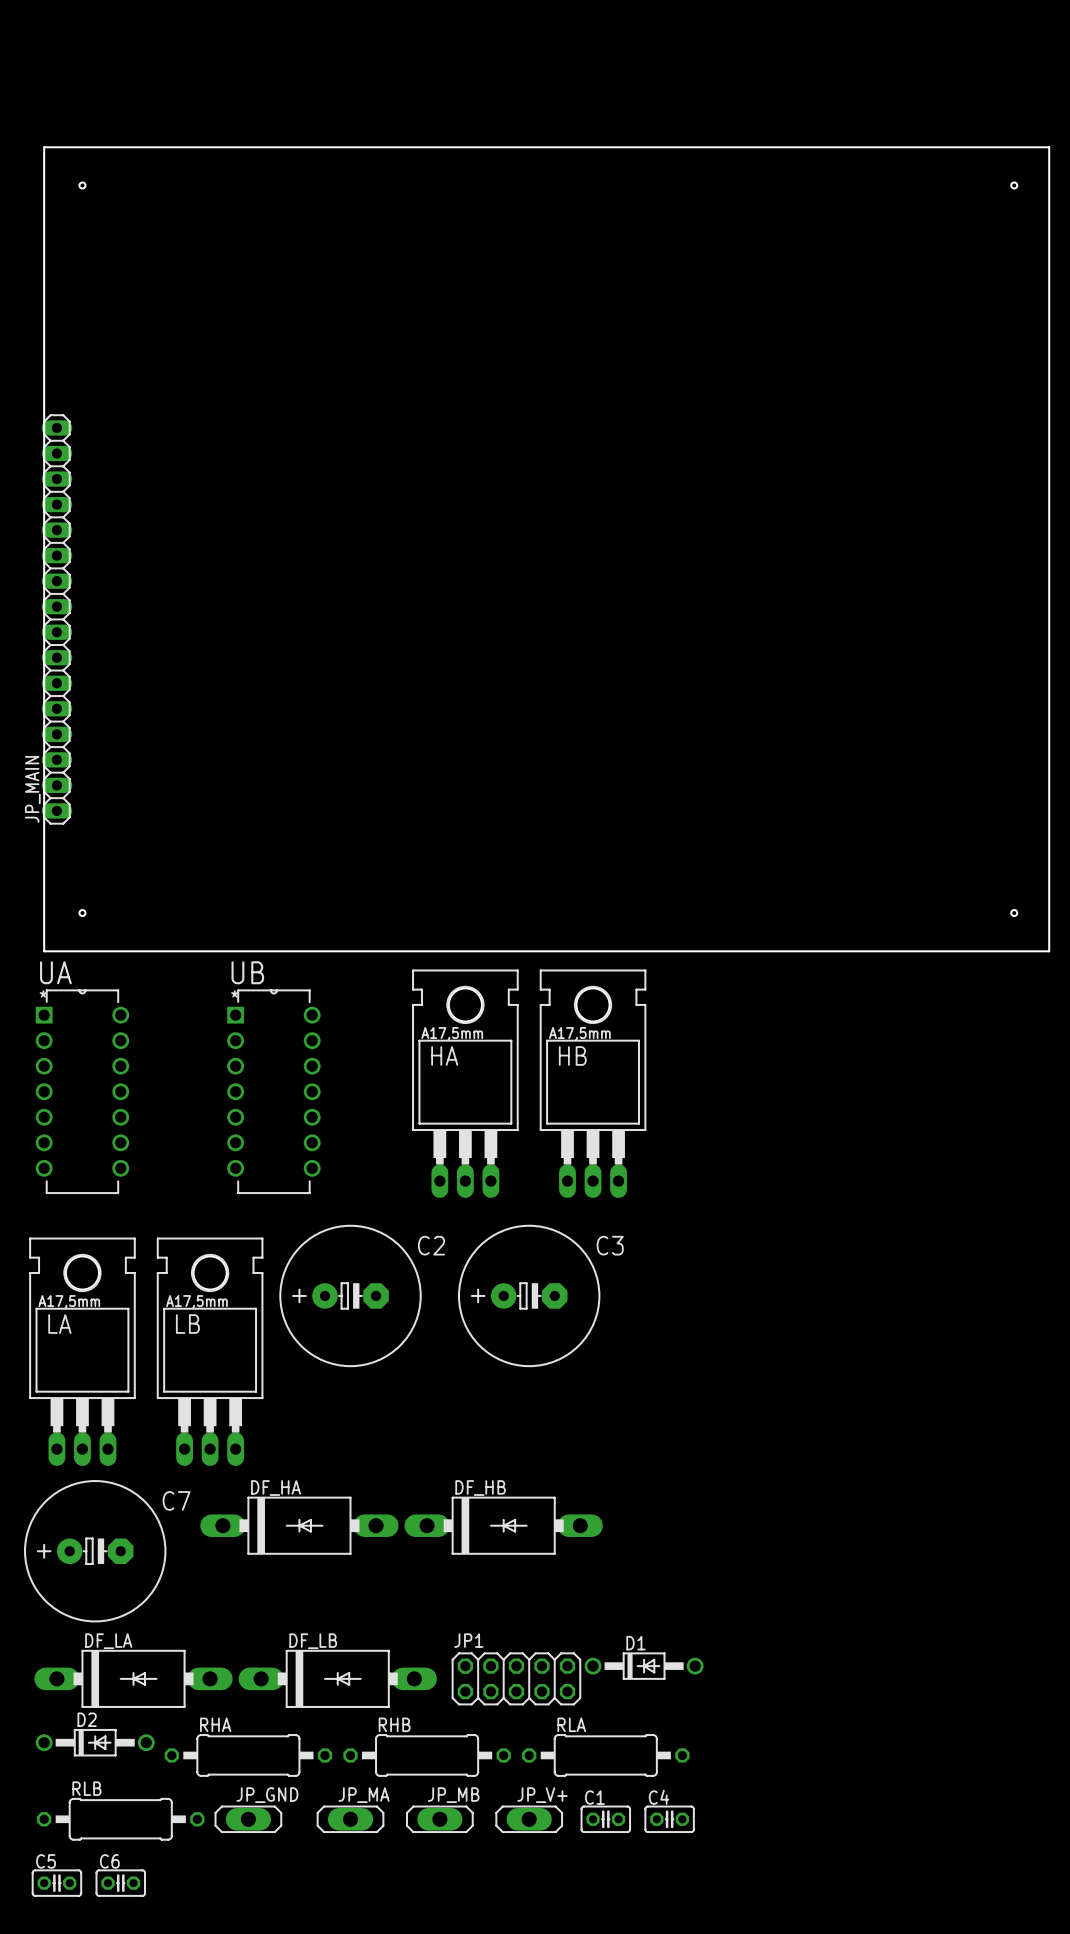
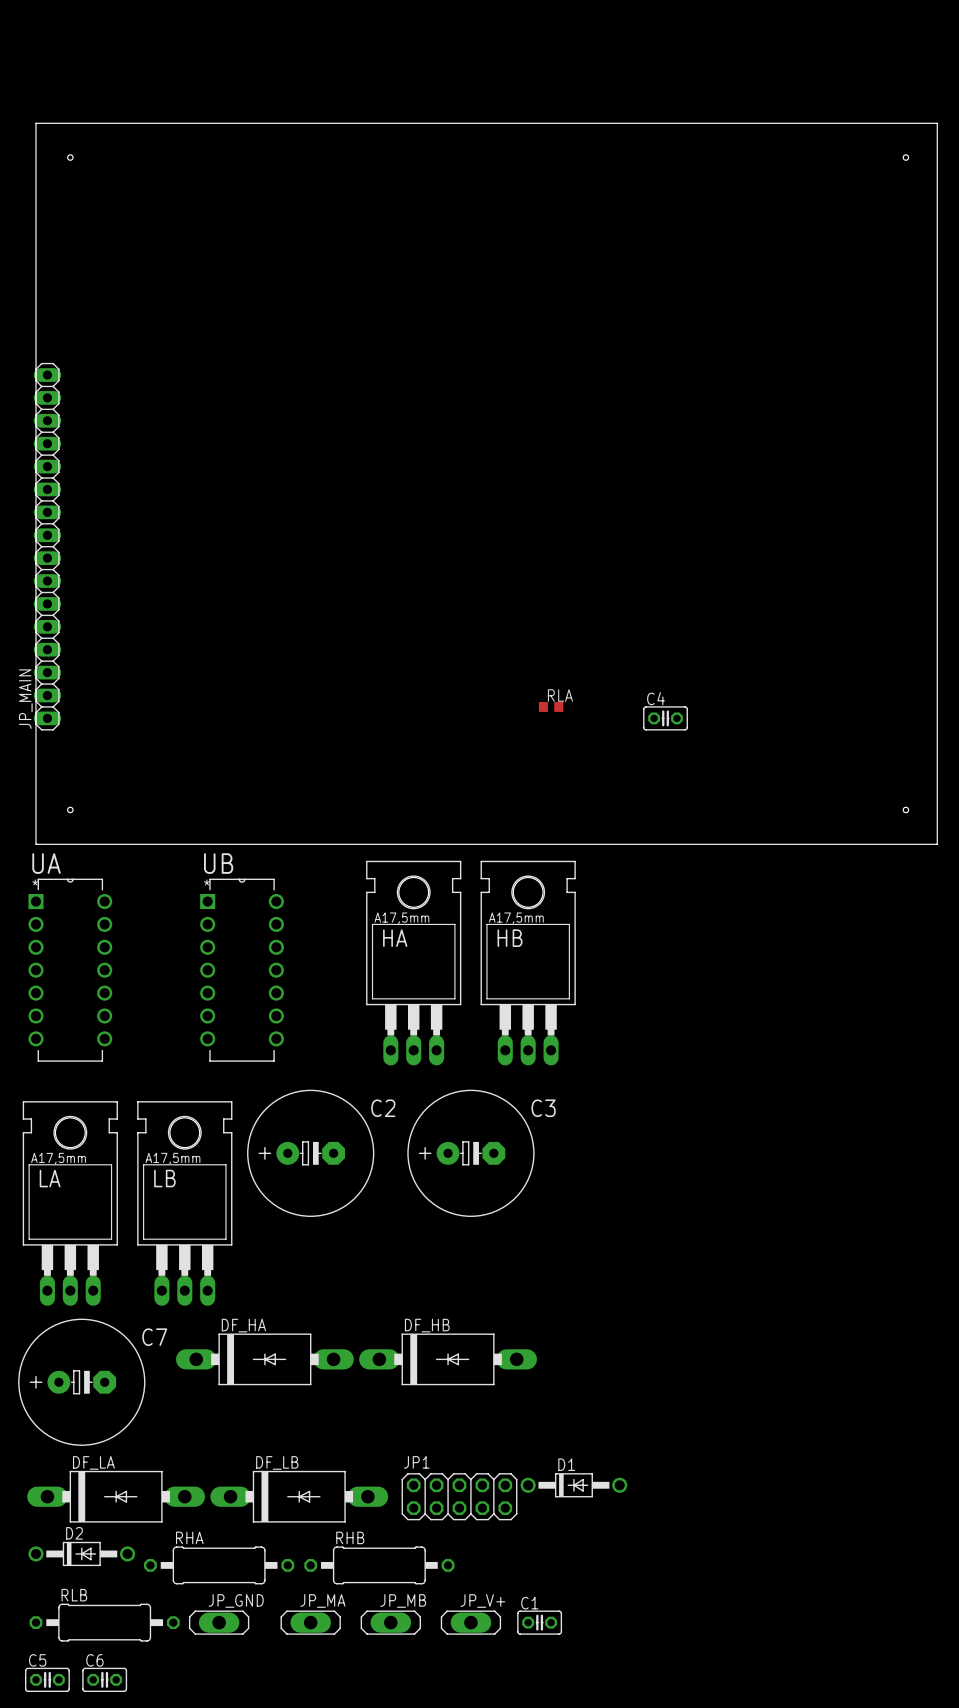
RLA: none -> (551, 706)
RLA: (605, 1755) -> none
C4 position: (669, 1819) -> (665, 718)

